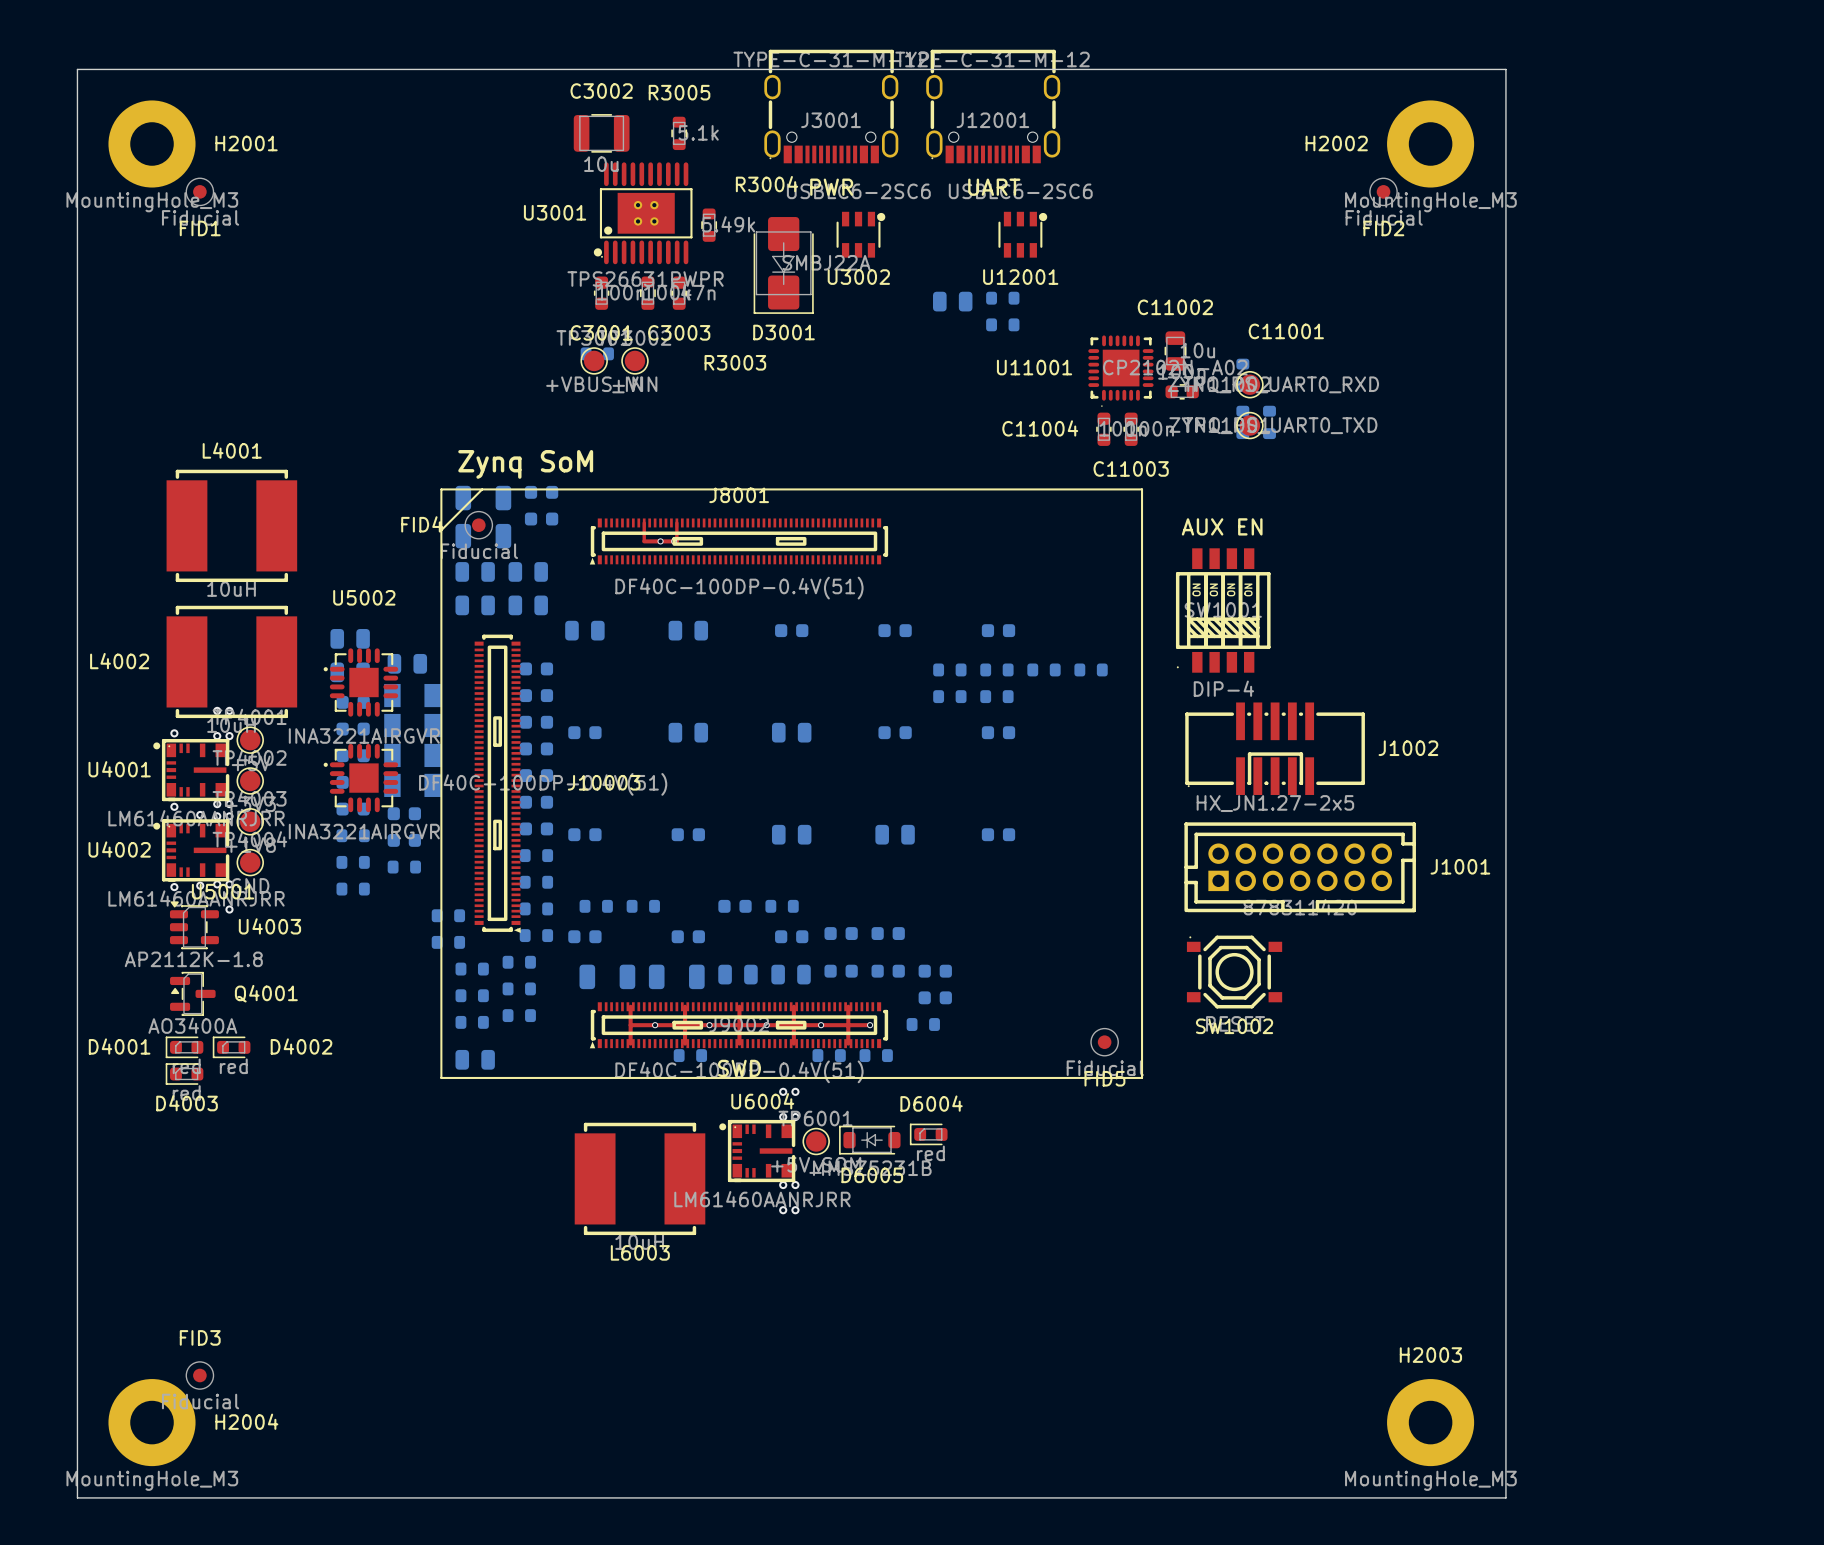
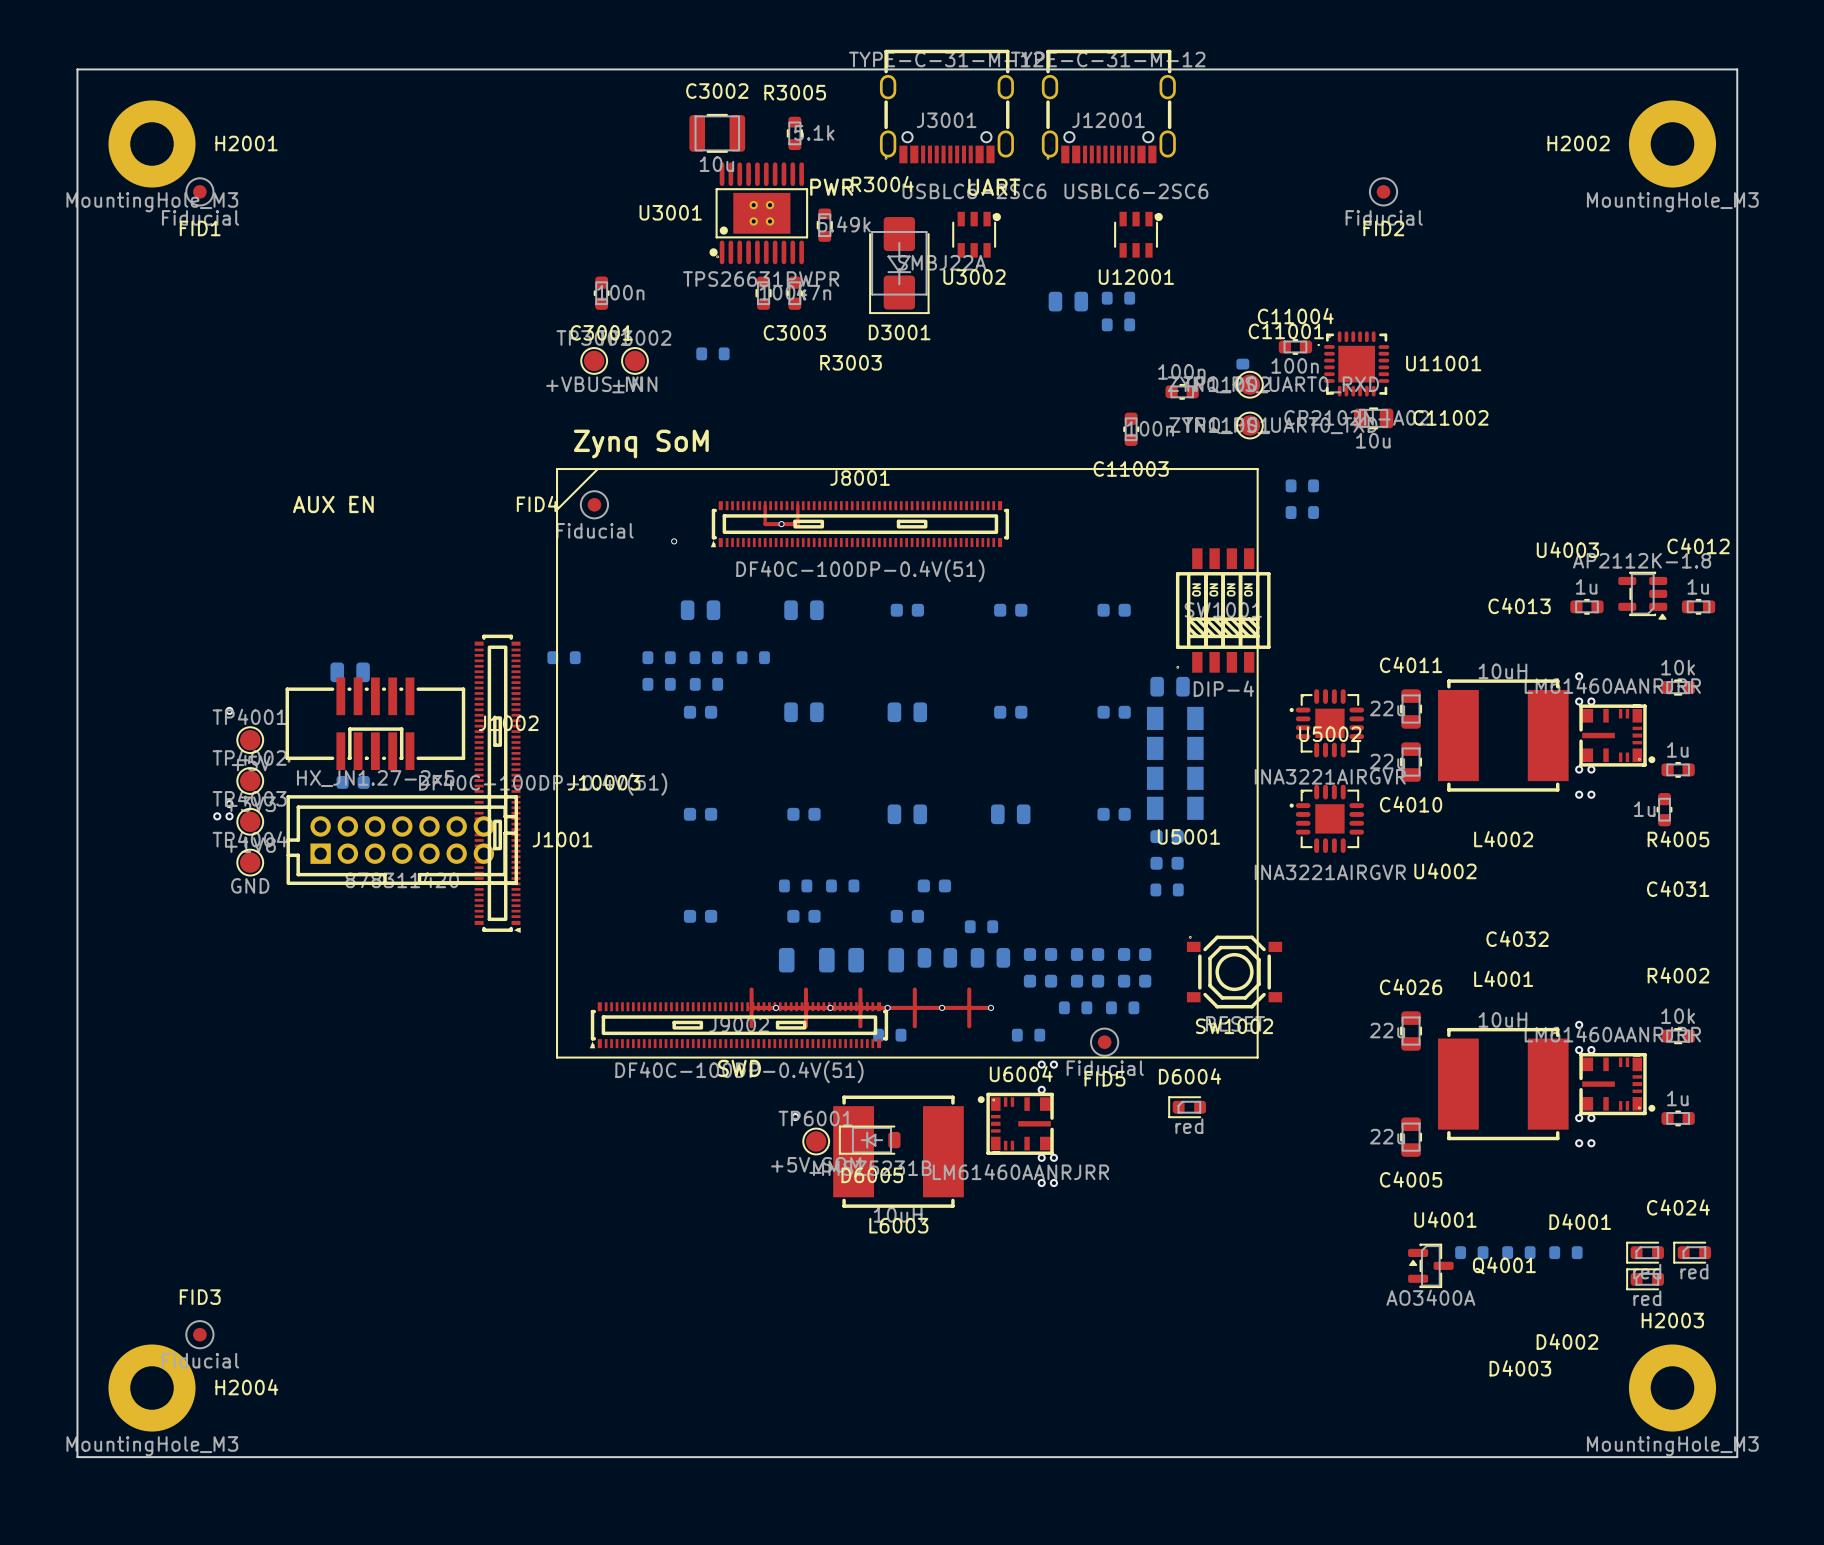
board edge: (1505, 69) (1505, 1497) (77, 1497) (77, 1457) -> (1505, 69) (1737, 69) (1737, 1457) (77, 1457)
J3001 position: (831, 106) -> (946, 106)
J12001 position: (993, 106) -> (1108, 106)
C3002 position: (601, 133) -> (717, 133)
R3005 position: (679, 133) -> (794, 133)
H2002 position: (1430, 143) -> (1672, 143)
U3001 position: (643, 213) -> (758, 213)
R3004 position: (709, 225) -> (824, 225)
U3002 position: (860, 234) -> (976, 234)
U12001 position: (1022, 234) -> (1138, 234)
D3001 position: (783, 265) -> (899, 265)
R3003 position: (647, 293) -> (763, 293)
C3003 position: (679, 293) -> (794, 293)
part: (1002, 298) -> none
part: none -> (1118, 298)
part position: (952, 301) -> (1068, 301)
C11002 name position: C11002 (1175, 307) -> C11002 (1450, 417)
part: (1002, 324) -> none
part: none -> (1118, 324)
C11002 rotation: 0° (1175, 351) -> 90° clockwise (1373, 418)
C11002 position: (1175, 351) -> (1373, 418)
part position: (597, 353) -> (712, 353)
U11001 name position: U11001 (1034, 367) -> U11001 (1443, 363)
U11001 rotation: 0° (1120, 370) -> 90° clockwise (1353, 363)
U11001 position: (1120, 370) -> (1353, 363)
part: (1242, 422) -> none
part: (1269, 422) -> none
C11004 name position: C11004 (1040, 428) -> C11004 (1295, 316)
C11004 rotation: 0° (1103, 429) -> 90° clockwise (1295, 346)
C11004 position: (1103, 429) -> (1295, 346)
L4001 name position: L4001 (232, 450) -> L4001 (1503, 978)
text position: Zynq SoM (525, 464) -> Zynq SoM (641, 444)
part: none -> (1302, 485)
line: (441, 489) (1142, 489) (1142, 1077) (441, 1077) (441, 489) -> (557, 469) (1257, 469) (1257, 1057) (557, 1057) (557, 469)
line: (482, 489) (441, 530) -> (597, 469) (557, 509)
part: (541, 492) -> none
part: (483, 498) -> none
text: none -> AUX EN (333, 504)
part: none -> (1302, 512)
part: (541, 519) -> none
top track: (644, 522) (644, 541) (676, 541) (676, 522) -> (765, 505) (765, 524) (797, 524) (797, 505)
via: none -> (781, 524)
L4001 rotation: 0° (231, 525) -> 180° (1503, 1084)
L4001 position: (231, 525) -> (1503, 1084)
FID4 position: (478, 525) -> (594, 504)
text: AUX EN (1222, 526) -> none
part: (483, 536) -> none
via: (660, 541) -> none
J8001 position: (738, 541) -> (859, 524)
part: (475, 571) -> none
part: (528, 571) -> none
part: (475, 605) -> none
part: (528, 605) -> none
C4013: none -> 1u (1586, 606)
C4012: none -> 1u (1698, 606)
part: none -> (803, 610)
part: none -> (1114, 610)
part: (584, 630) -> none
part position: (688, 630) -> (700, 610)
part: (791, 630) -> none
part position: (895, 630) -> (907, 610)
part position: (998, 630) -> (1010, 610)
part: (350, 638) -> none
part: none -> (564, 657)
part: none -> (659, 657)
part: none -> (706, 657)
part: none -> (753, 657)
L4002 name position: L4002 (119, 661) -> L4002 (1503, 839)
L4002 rotation: 0° (231, 661) -> 180° (1503, 735)
L4002 position: (231, 661) -> (1503, 735)
part: (407, 663) -> none
part: (536, 668) -> none
part: (949, 669) -> none
part: (996, 669) -> none
part: (1043, 669) -> none
part: (1091, 669) -> none
via: none -> (1579, 676)
U5002 position: (360, 682) -> (1326, 818)
part: none -> (659, 684)
part: none -> (706, 684)
part: none -> (1170, 686)
R4005: none -> 10k (1678, 687)
part: (412, 695) -> none
part: (536, 695) -> none
part: (949, 696) -> none
part: (996, 696) -> none
via: none -> (1579, 701)
via: none -> (1591, 701)
part: (353, 702) -> none
C4011: none -> 22u (1411, 709)
via: (217, 710) -> none
part: none -> (700, 712)
part: none -> (907, 712)
part: none -> (1114, 712)
part: none -> (1175, 718)
part: (536, 722) -> none
part: (412, 725) -> none
part: (353, 729) -> none
part: (584, 732) -> none
part: (688, 732) -> none
part position: (791, 732) -> (803, 712)
part: (895, 732) -> none
part position: (998, 732) -> (1010, 712)
via: (174, 733) -> none
via: (217, 736) -> none
via: (229, 736) -> none
part: (536, 748) -> none
part: none -> (1175, 748)
J1002 position: (1275, 748) -> (375, 723)
part: (353, 755) -> none
part: (412, 755) -> none
C4010: none -> 22u (1411, 762)
U4001 name position: U4001 (119, 769) -> U4001 (1445, 1219)
via: none -> (1579, 769)
via: none -> (1591, 769)
C4031: none -> 1u (1678, 769)
U4001 rotation: 0° (191, 770) -> 180° (1617, 1084)
U4001 position: (191, 770) -> (1617, 1084)
part: (536, 775) -> none
U5001 position: (360, 778) -> (1326, 723)
part: none -> (1175, 778)
part: (412, 785) -> none
via: none -> (1579, 794)
via: none -> (1591, 794)
part: (536, 802) -> none
via: (217, 804) -> none
via: (174, 806) -> none
part: none -> (1175, 808)
part: (353, 809) -> none
C4032: none -> 1u (1664, 809)
part: (404, 813) -> none
via: (200, 814) -> none
part: none -> (803, 814)
part: none -> (1010, 814)
part: none -> (1114, 814)
part: (536, 828) -> none
part: (584, 834) -> none
part position: (688, 834) -> (700, 814)
part: (791, 834) -> none
part position: (895, 834) -> (907, 814)
part: (998, 834) -> none
part: (353, 835) -> none
part: none -> (1167, 836)
part: (404, 840) -> none
U4002 name position: U4002 (119, 849) -> U4002 (1445, 871)
U4002 rotation: 0° (191, 850) -> 180° (1617, 735)
U4002 position: (191, 850) -> (1617, 735)
part: (536, 855) -> none
part: (353, 862) -> none
part: none -> (1167, 863)
part: (404, 867) -> none
J1001 position: (1300, 867) -> (402, 840)
part: (536, 882) -> none
via: (217, 884) -> none
via: (229, 884) -> none
via: (200, 885) -> none
part: none -> (842, 885)
part: none -> (934, 885)
via: (174, 887) -> none
part: (353, 889) -> none
part: none -> (1167, 889)
part: (596, 906) -> none
part: (643, 906) -> none
part: (735, 906) -> none
part position: (782, 906) -> (795, 885)
part: (536, 908) -> none
via: (229, 909) -> none
part: (448, 915) -> none
part: none -> (700, 916)
part: none -> (803, 916)
U4003 rotation: 0° (194, 925) -> 180° (1642, 595)
U4003 position: (194, 925) -> (1642, 595)
U4003 name position: U4003 (269, 926) -> U4003 (1567, 549)
part: none -> (981, 926)
part: (841, 933) -> none
part position: (888, 933) -> (907, 916)
part: (536, 935) -> none
part: (584, 936) -> none
part: (688, 936) -> none
part: (791, 936) -> none
part: (448, 942) -> none
part: none -> (1040, 954)
part: none -> (1087, 954)
part: none -> (1134, 954)
part: none -> (990, 957)
part: none -> (806, 960)
part: none -> (876, 960)
part: (519, 962) -> none
part footprint: [918, 964, 952, 978] -> [917, 948, 958, 968]
part: (472, 969) -> none
part: (841, 971) -> none
part: (888, 971) -> none
part: (737, 974) -> none
part: (791, 974) -> none
part: (607, 976) -> none
part: (676, 976) -> none
part: none -> (1040, 981)
part: none -> (1087, 981)
part: none -> (1134, 981)
part: (519, 988) -> none
Q4001 position: (192, 993) -> (1430, 1265)
part: (472, 995) -> none
part: (935, 997) -> none
top track: (630, 1006) (630, 1043) -> (751, 989) (751, 1026)
top track: (685, 1006) (685, 1043) -> (805, 989) (805, 1026)
top track: (739, 1006) (739, 1043) -> (860, 989) (860, 1026)
top track: (793, 1006) (793, 1043) -> (914, 989) (914, 1026)
top track: (848, 1006) (848, 1043) -> (969, 989) (969, 1026)
via: none -> (887, 1007)
via: none -> (942, 1007)
via: none -> (991, 1007)
part: none -> (1075, 1007)
part: none -> (1122, 1007)
part: (519, 1015) -> none
part: (472, 1022) -> none
part: (923, 1024) -> none
via: none -> (1579, 1024)
top track: (630, 1025) (870, 1025) -> (751, 1007) (991, 1007)
via: (655, 1025) -> none
via: (709, 1025) -> none
via position: (766, 1025) -> (776, 1007)
via position: (821, 1025) -> (830, 1007)
via: (870, 1025) -> none
C4026: none -> 22u (1411, 1031)
part: none -> (889, 1035)
part: none -> (1028, 1035)
R4002: none -> 10k (1678, 1036)
D4001 name position: D4001 (119, 1046) -> D4001 (1580, 1221)
D4002 name position: D4002 (301, 1046) -> D4002 (1567, 1341)
D4001 position: (184, 1047) -> (1645, 1252)
D4002 position: (231, 1047) -> (1692, 1252)
via: none -> (1579, 1050)
via: none -> (1591, 1050)
part: (690, 1055) -> none
part: (829, 1055) -> none
part: (876, 1055) -> none
part: (475, 1059) -> none
via: none -> (1041, 1064)
via: none -> (1053, 1064)
D4003 position: (184, 1074) -> (1645, 1279)
via: none -> (1041, 1089)
via: (783, 1091) -> none
via: (795, 1091) -> none
D4003 name position: D4003 (187, 1103) -> D4003 (1520, 1368)
via: (783, 1117) -> none
via: none -> (1579, 1118)
via: none -> (1591, 1118)
C4024: none -> 1u (1678, 1118)
D6004 position: (928, 1134) -> (1187, 1107)
C4005: none -> 22u (1411, 1137)
via: none -> (1579, 1143)
via: none -> (1591, 1143)
U6004 position: (757, 1151) -> (1015, 1123)
via: none -> (1041, 1157)
via: none -> (1053, 1157)
L6003 position: (640, 1178) -> (898, 1151)
via: none -> (1041, 1182)
via: none -> (1053, 1182)
via: (783, 1185) -> none
via: (795, 1185) -> none
via: (783, 1210) -> none
via: (795, 1210) -> none
part: none -> (1471, 1252)
part: none -> (1518, 1252)
part: none -> (1565, 1252)
FID3 position: (199, 1375) -> (199, 1334)
H2004 position: (152, 1422) -> (152, 1388)
H2003 position: (1430, 1422) -> (1672, 1388)

